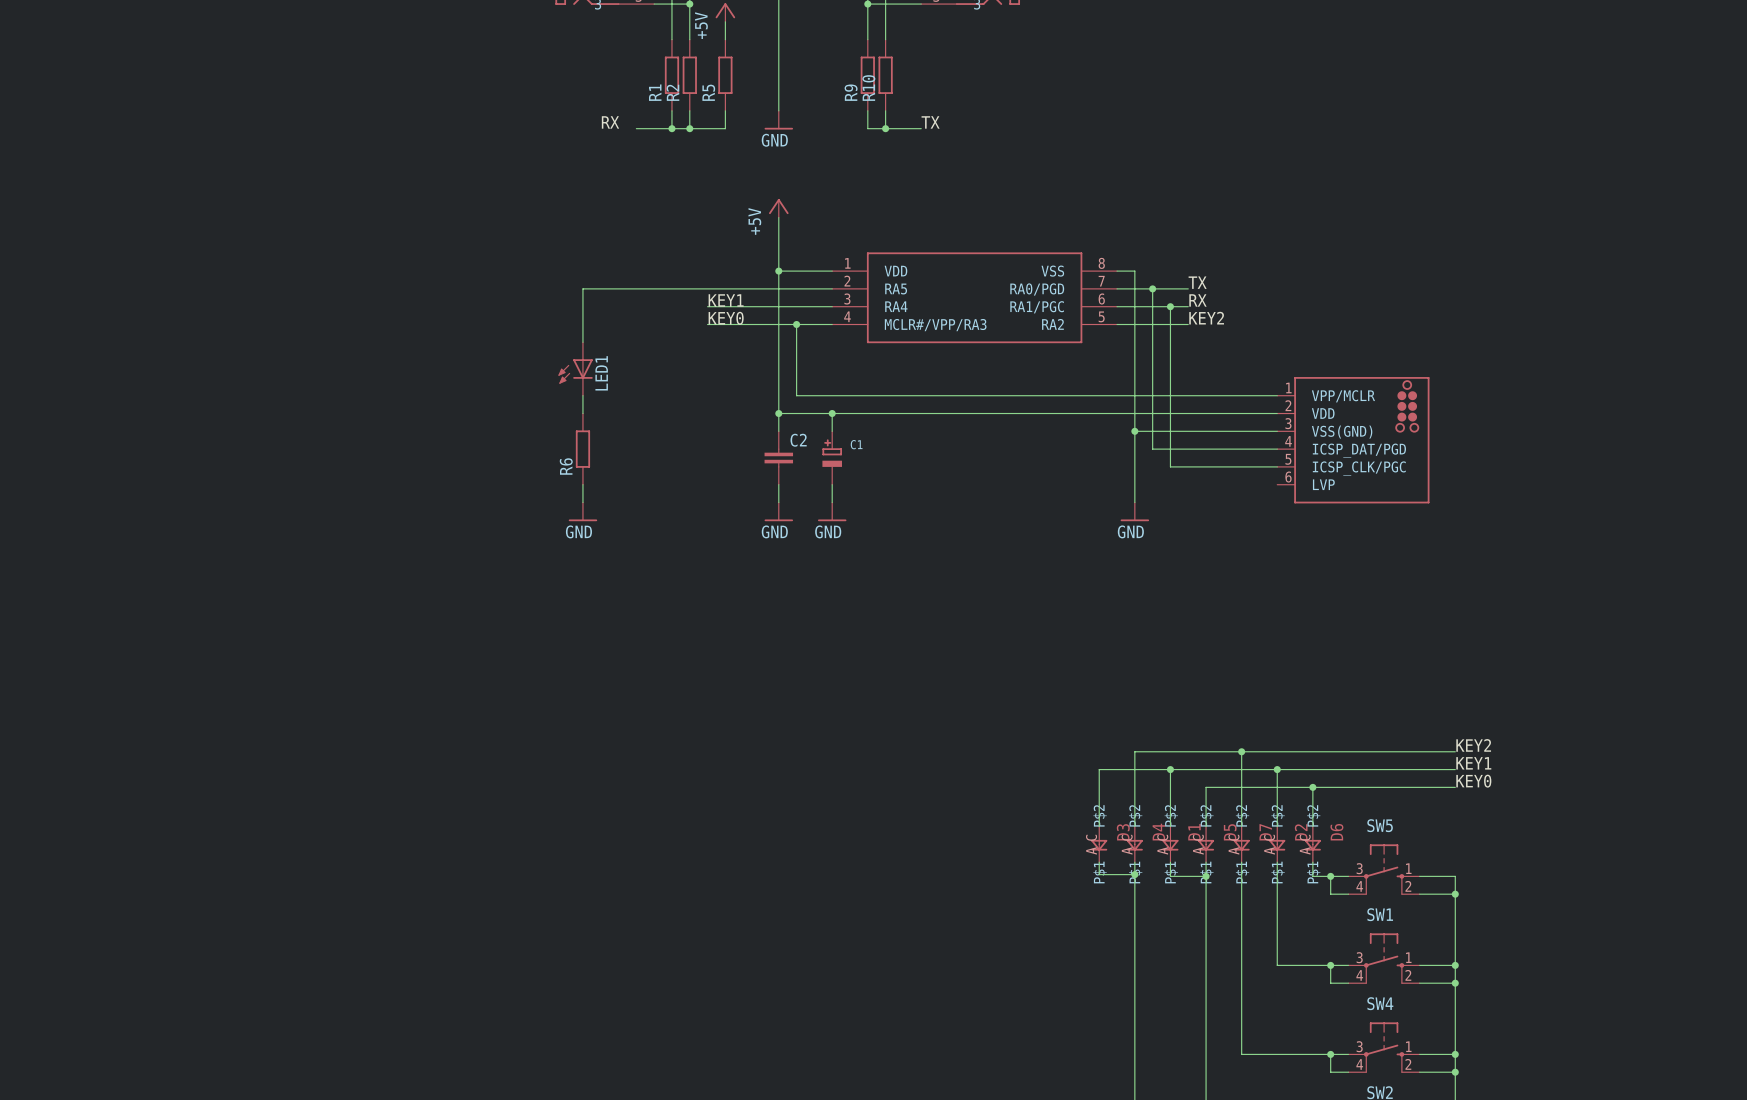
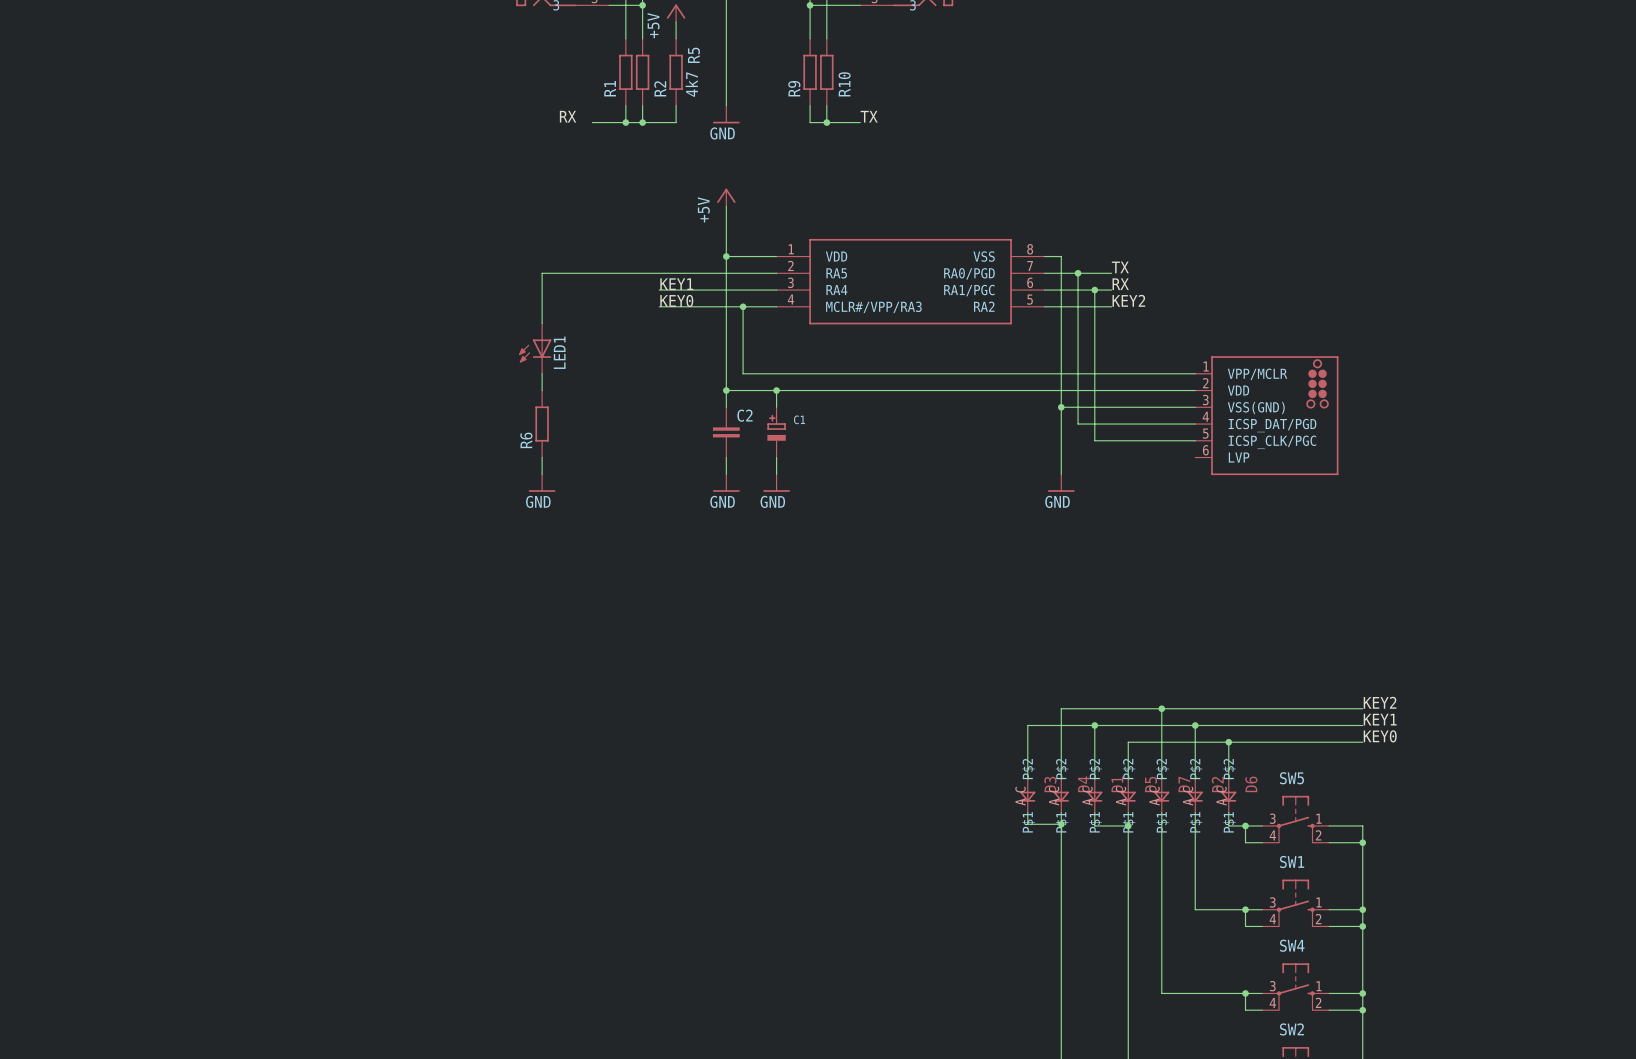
R5 value: none -> 4k7 (691, 84)
R10 name position: R10 (868, 88) -> R10 (844, 84)
R2 name position: R2 (672, 92) -> R2 (660, 88)
R5 name position: R5 (708, 92) -> R5 (693, 55)

